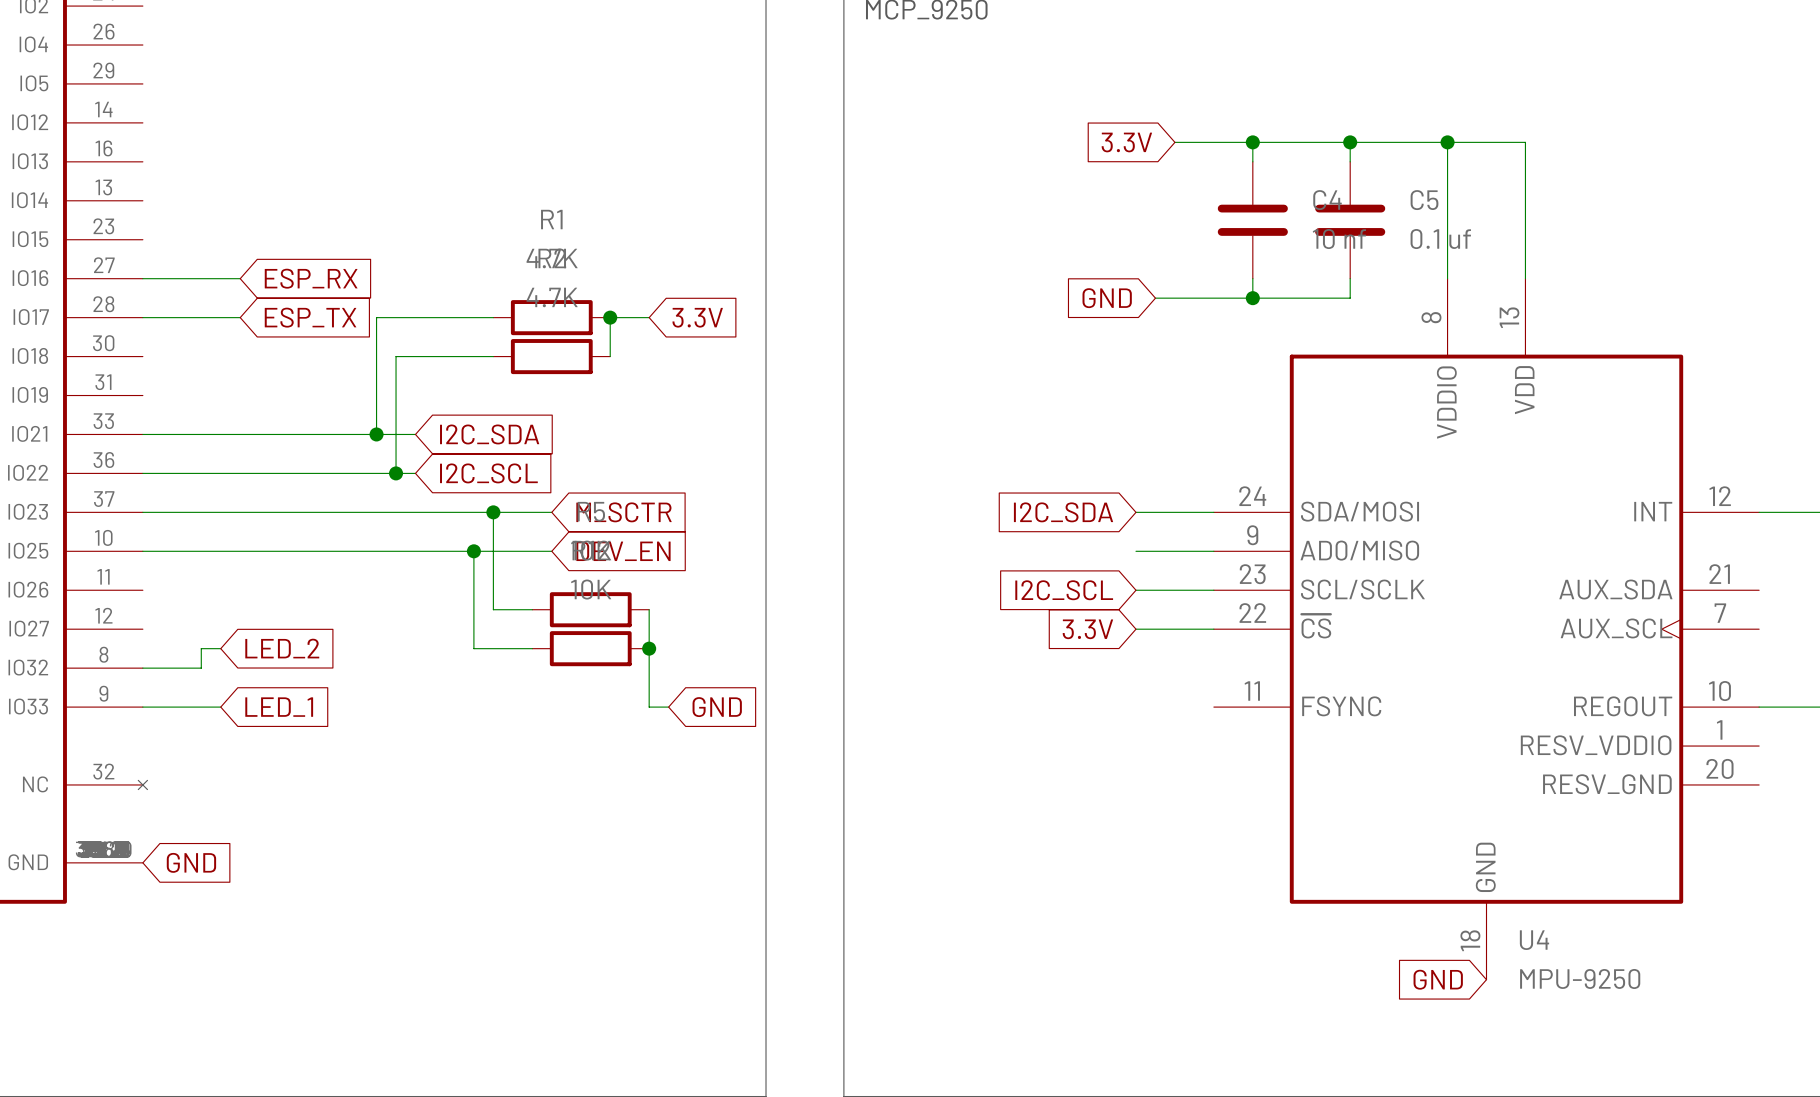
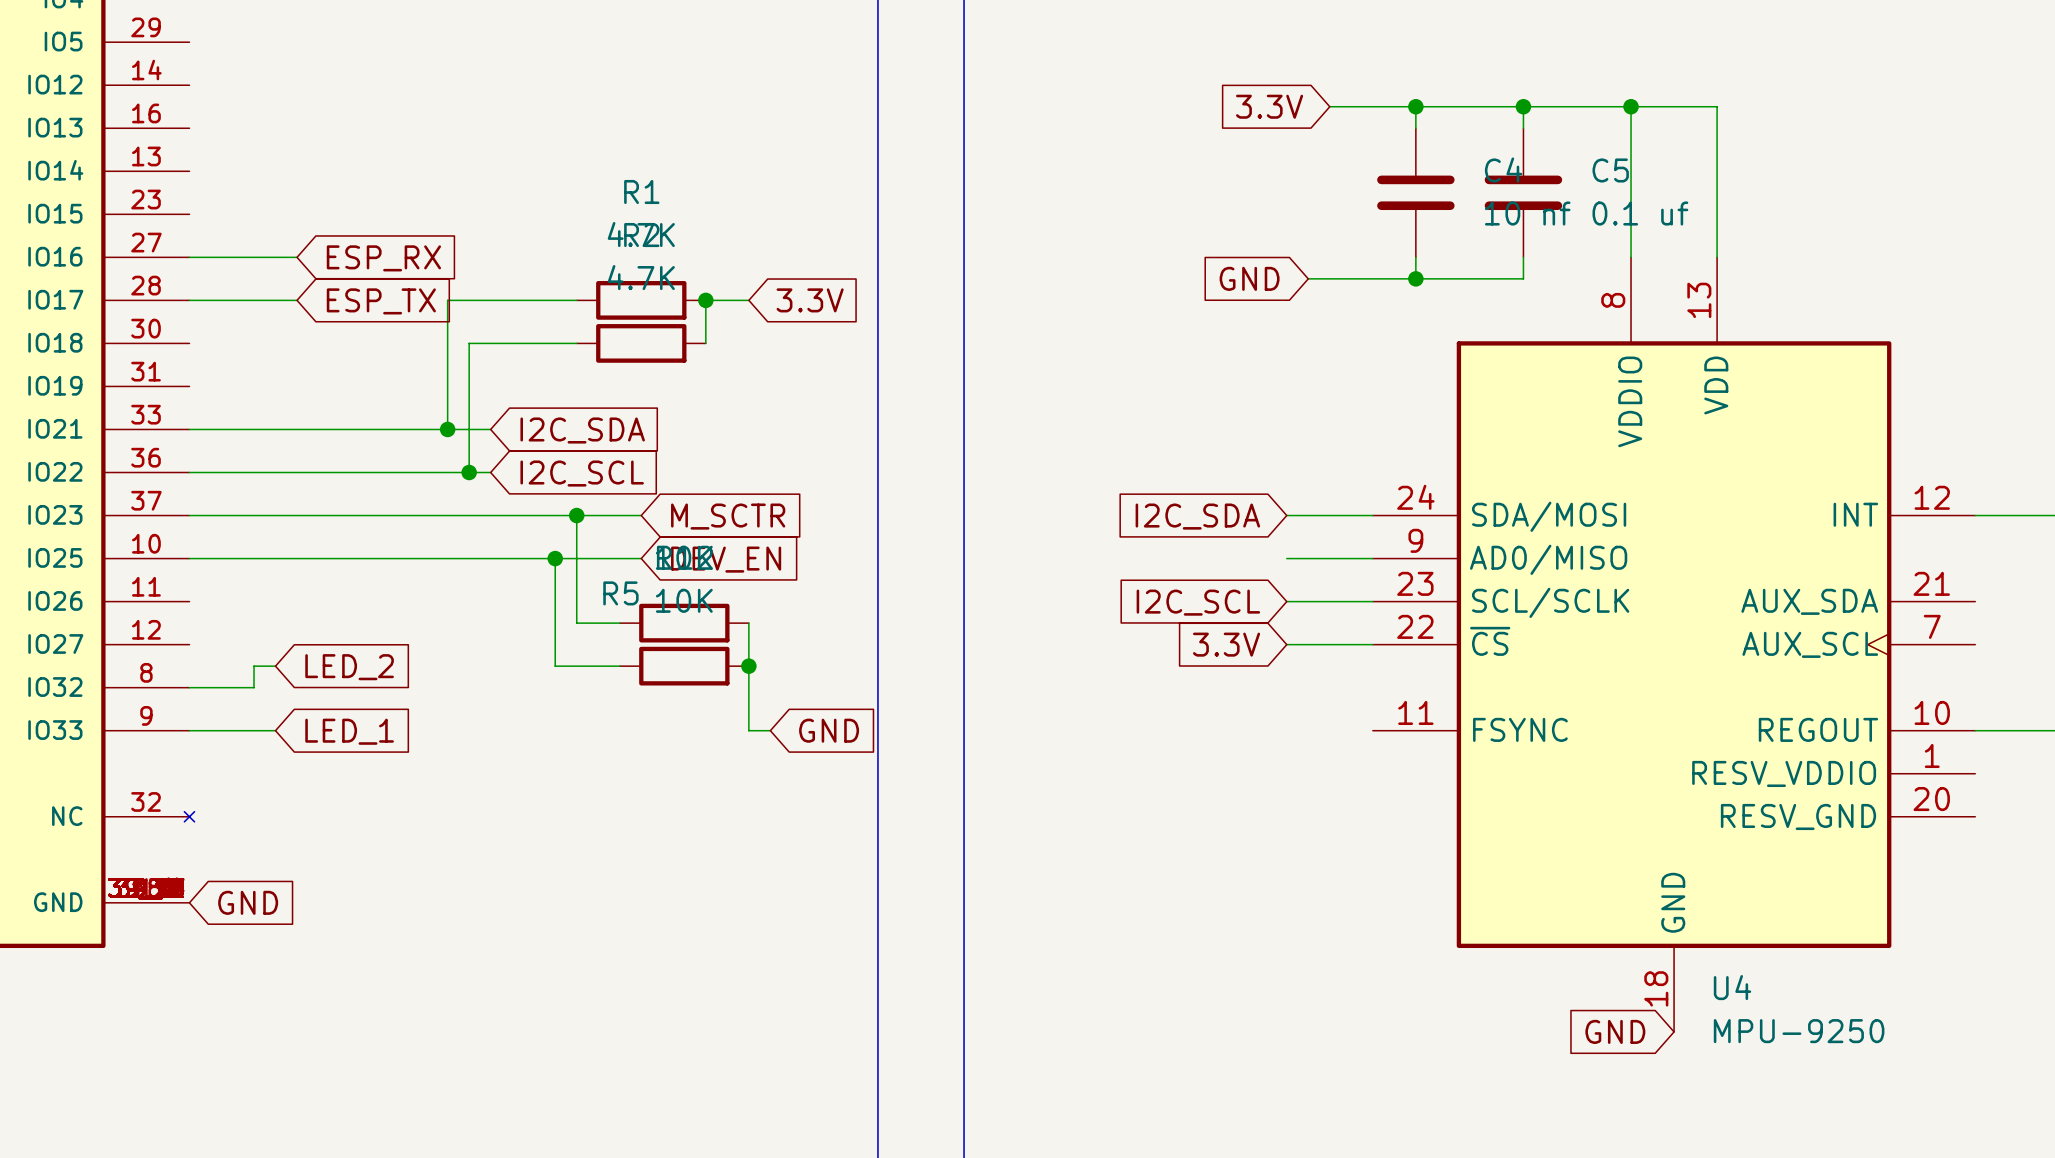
R5 name position: R5 (591, 511) -> R5 (620, 593)

